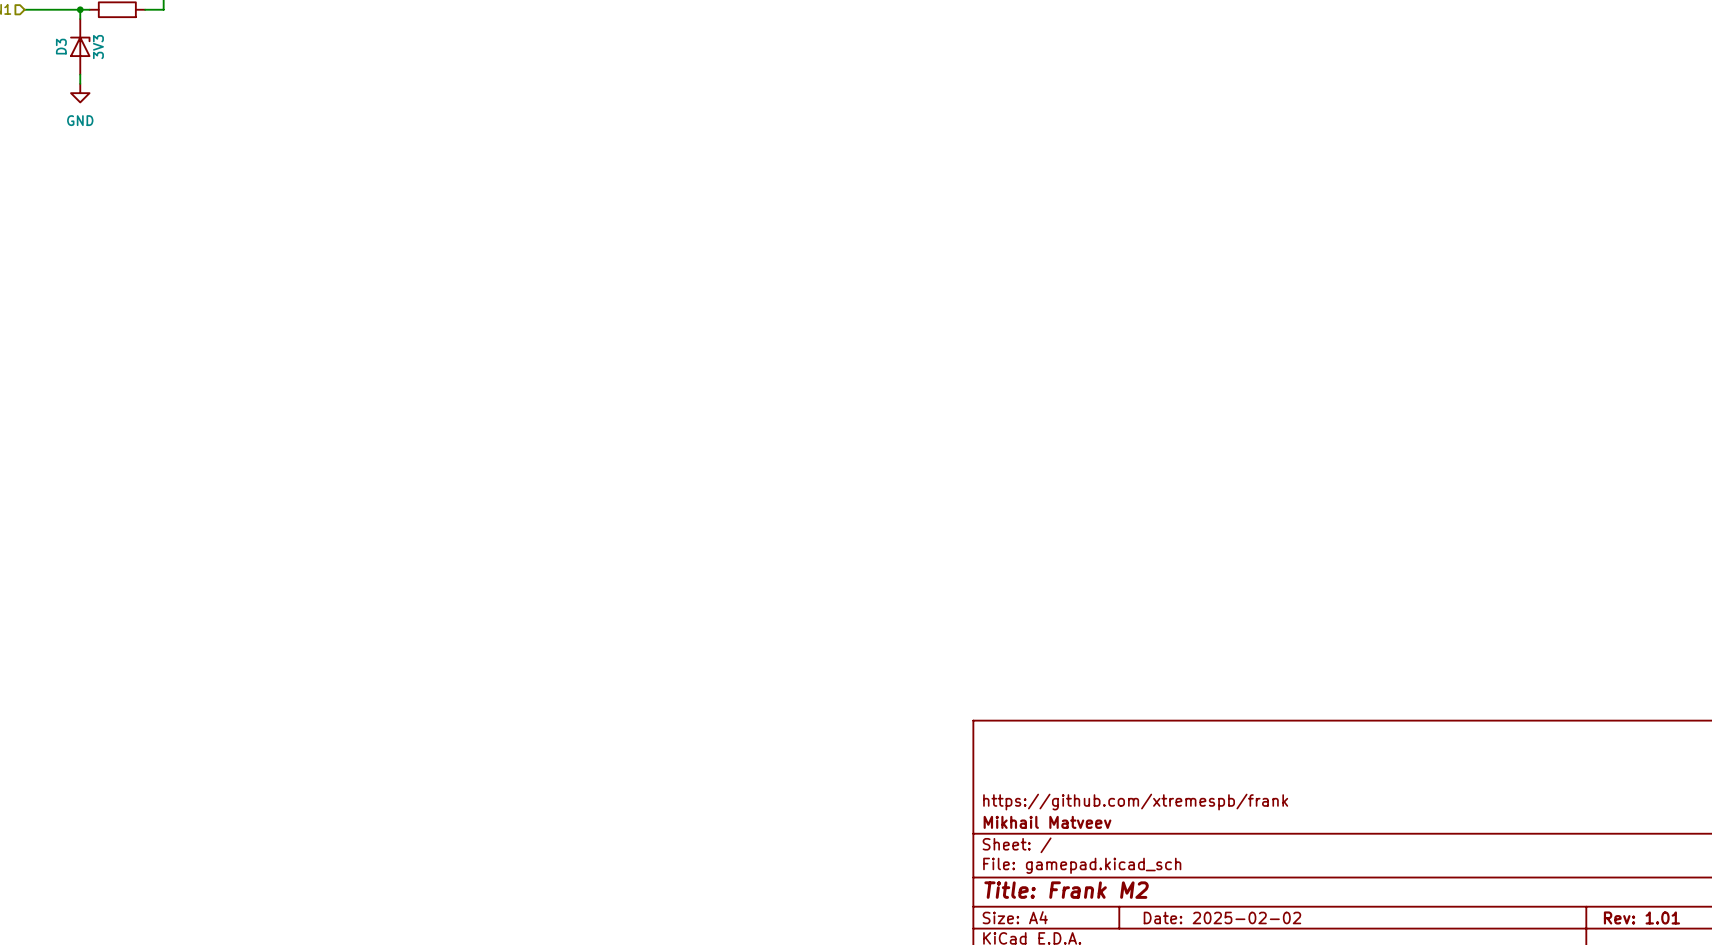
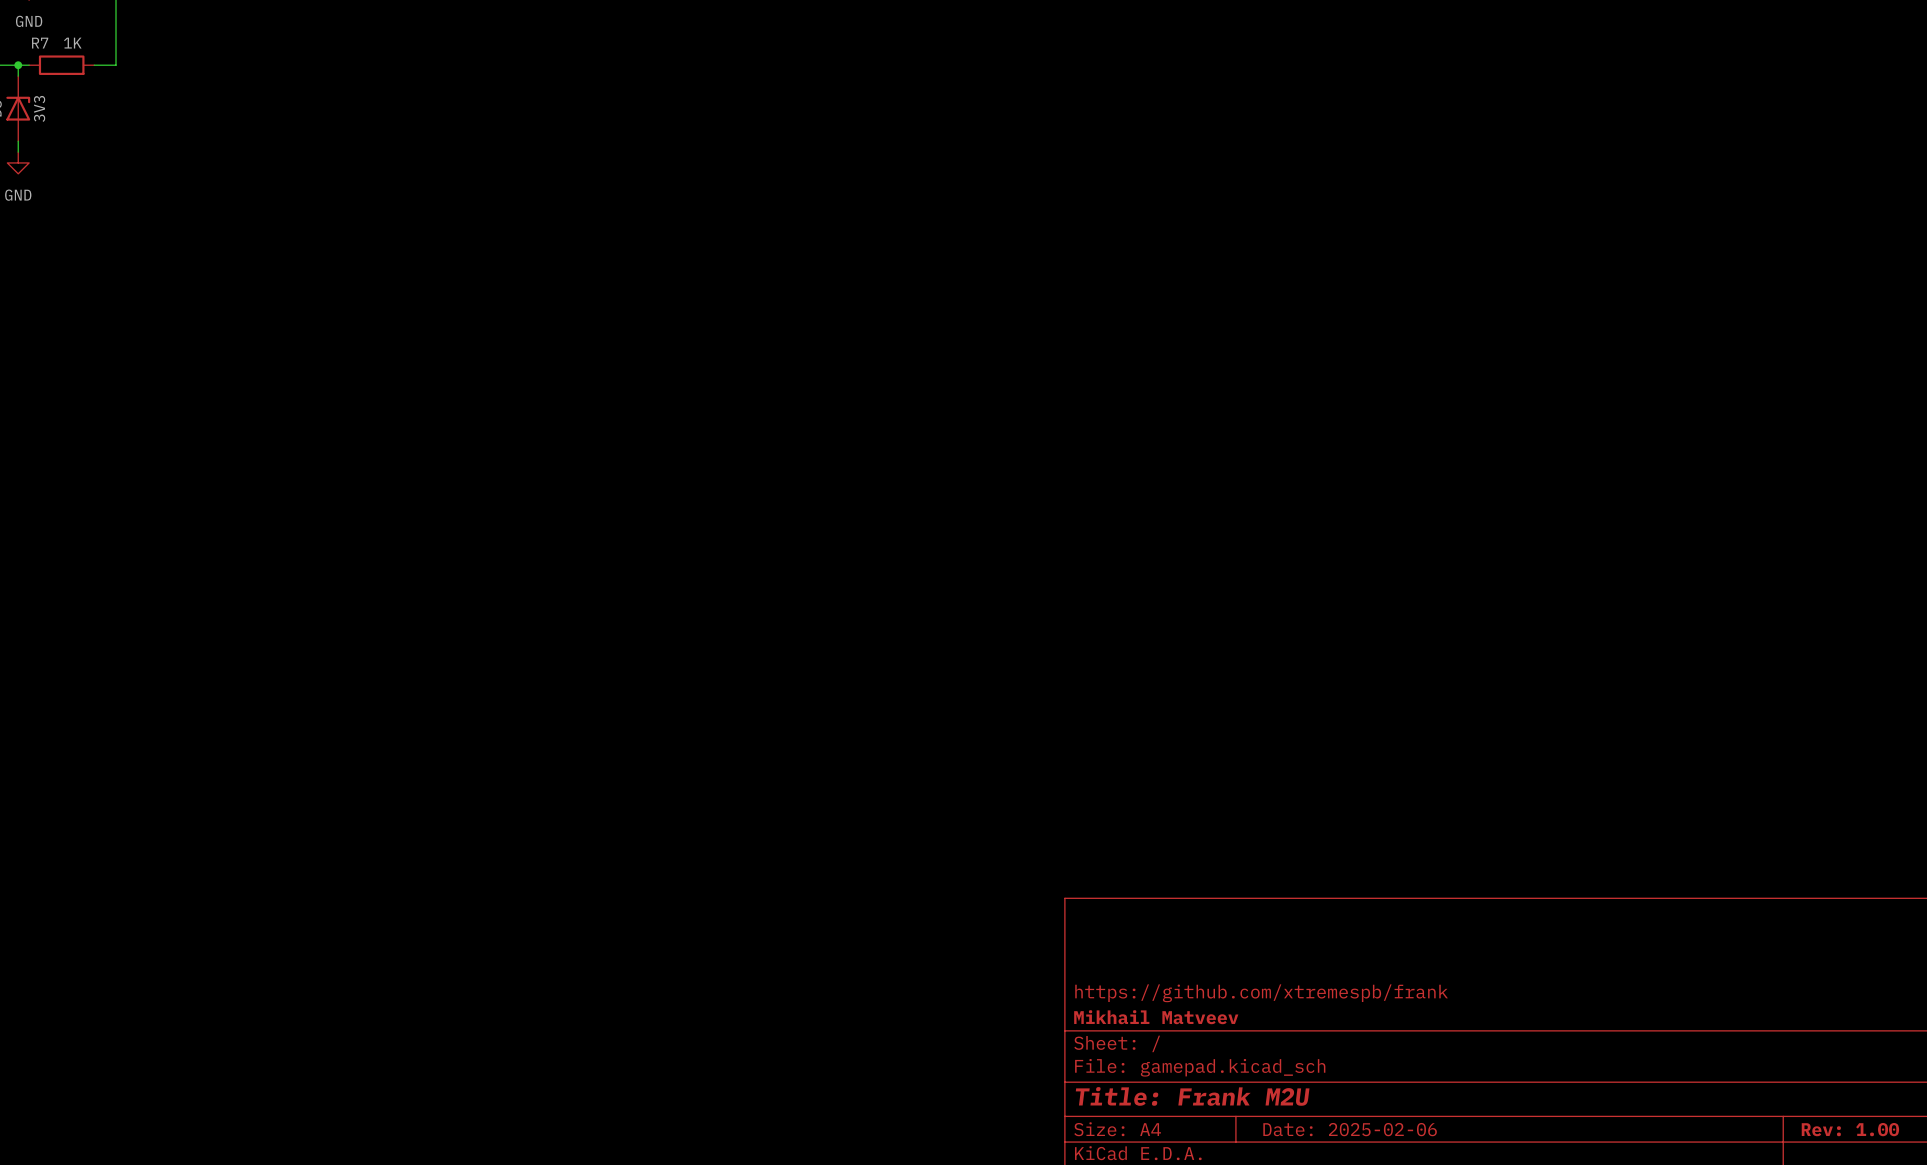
title block: Title: Frank M2 (1066, 890) -> Title: Frank M2U (1192, 1096)
title block: Date: 2025-02-02 (1222, 917) -> Date: 2025-02-06 (1350, 1129)
title block: Rev: 1.01 (1641, 917) -> Rev: 1.00 (1850, 1129)

